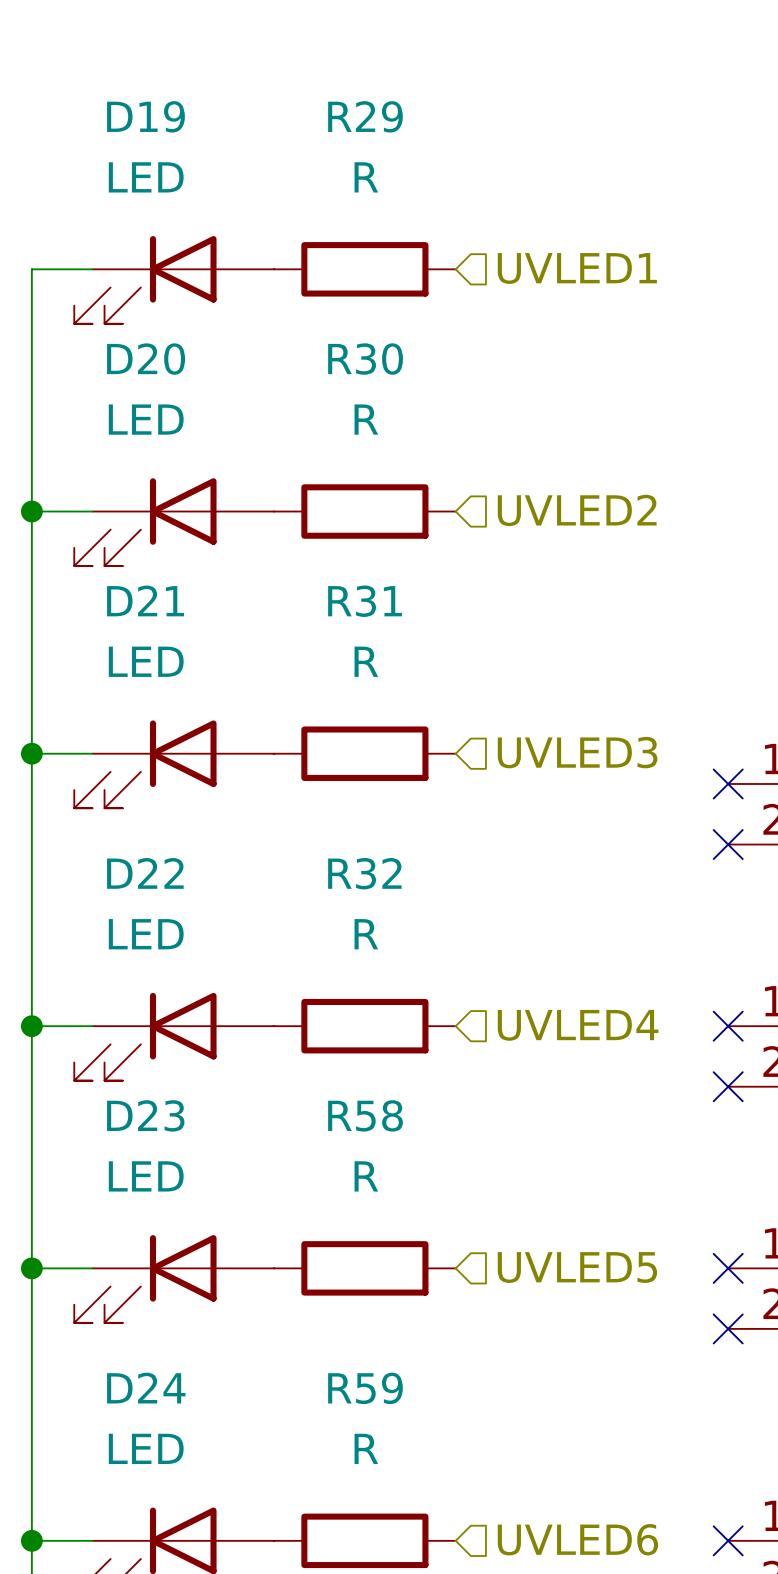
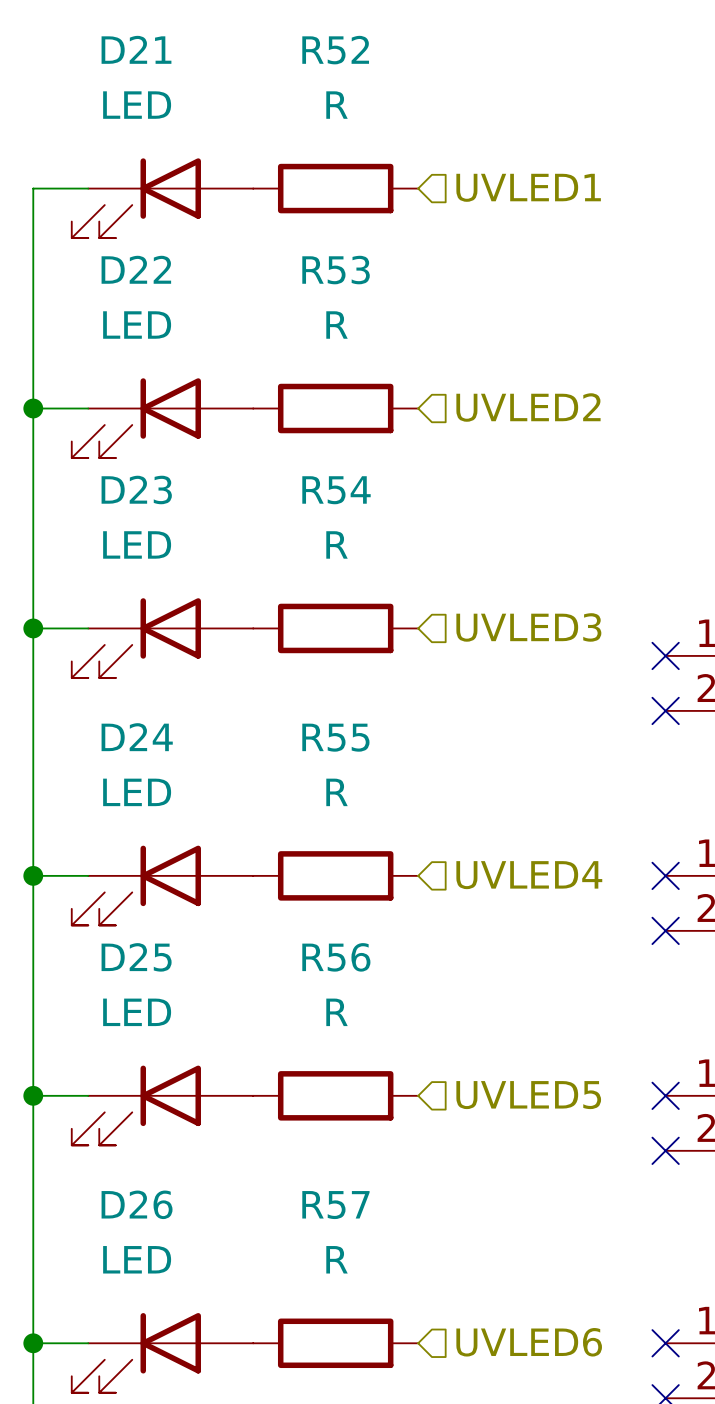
D19 name: D19 (145, 116) -> D21 (136, 49)
R29 name: R29 (365, 116) -> R52 (335, 50)
D20 name: D20 (146, 359) -> D22 (136, 269)
R30 name: R30 (365, 359) -> R53 (336, 270)
D21 name: D21 (145, 600) -> D23 (136, 489)
R31 name: R31 (365, 601) -> R54 (336, 490)
D22 name: D22 (145, 873) -> D24 (137, 737)
R32 name: R32 (364, 873) -> R55 (335, 737)
D23 name: D23 (145, 1115) -> D25 (136, 957)
R58 name: R58 (365, 1115) -> R56 (336, 957)
D24 name: D24 (146, 1388) -> D26 (137, 1204)
R59 name: R59 (365, 1388) -> R57 (335, 1205)

